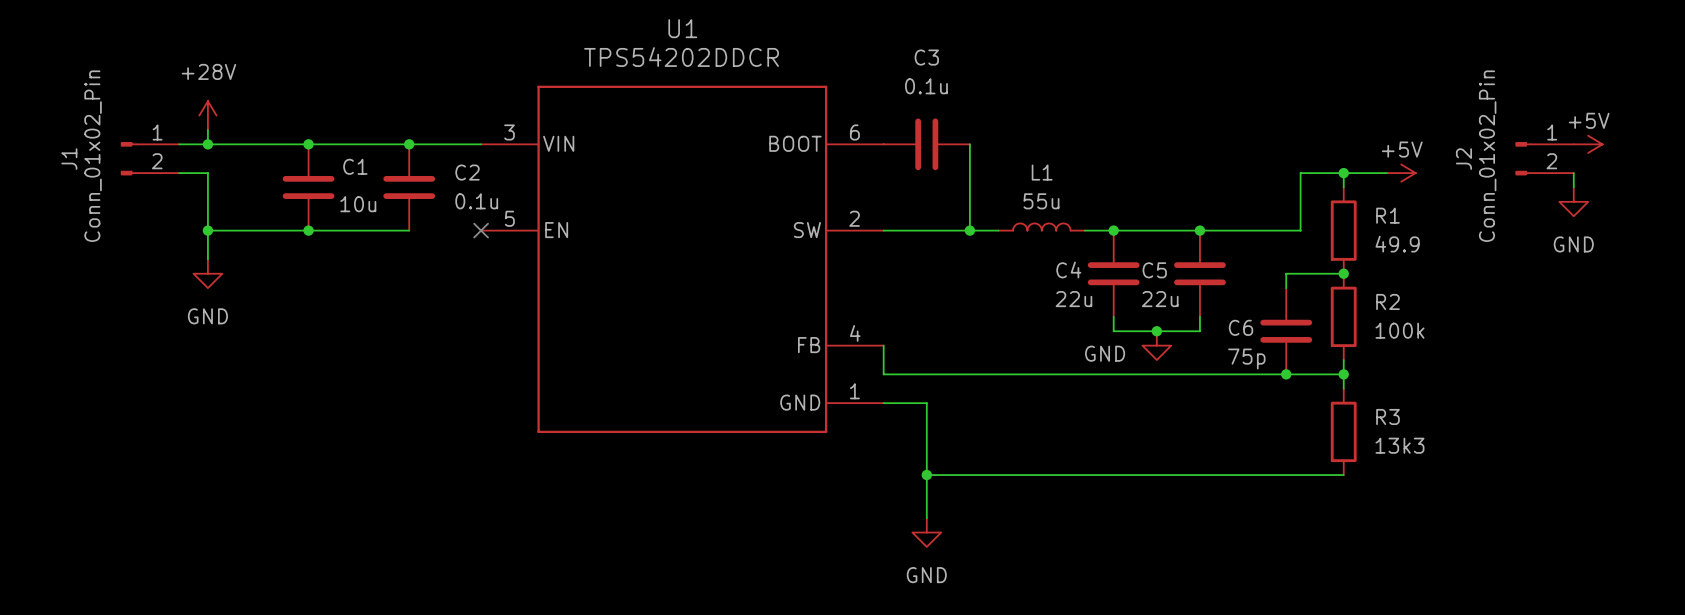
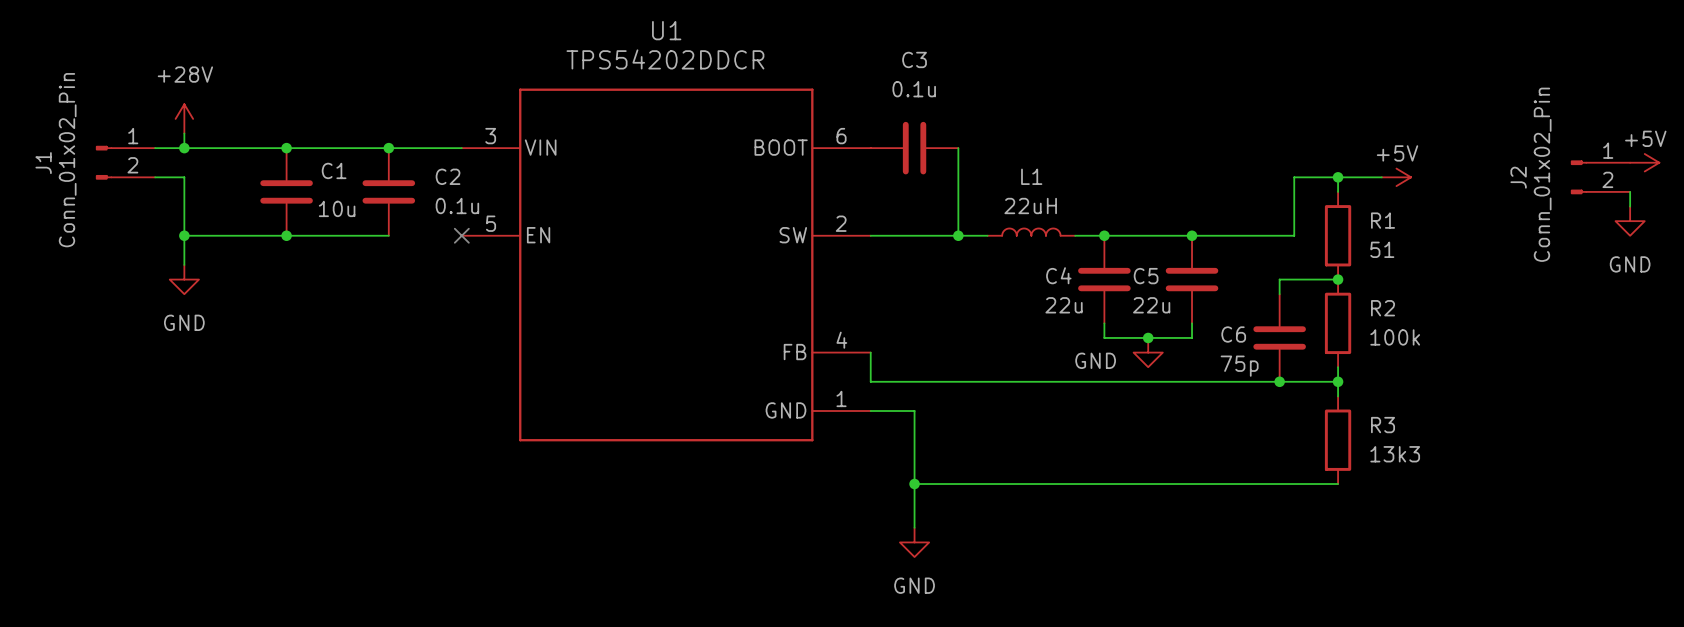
power symbol position: +5V (1588, 144) -> +5V (1644, 162)
J2 position: (1544, 158) -> (1600, 177)
wire: (1573, 173) (1573, 187) -> (1630, 191) (1630, 206)
L1 value: 55u (1041, 201) -> 22uH (1030, 205)
power symbol position: GND (1573, 201) -> GND (1630, 221)
R1 value: 49.9 (1397, 244) -> 51 (1382, 249)

